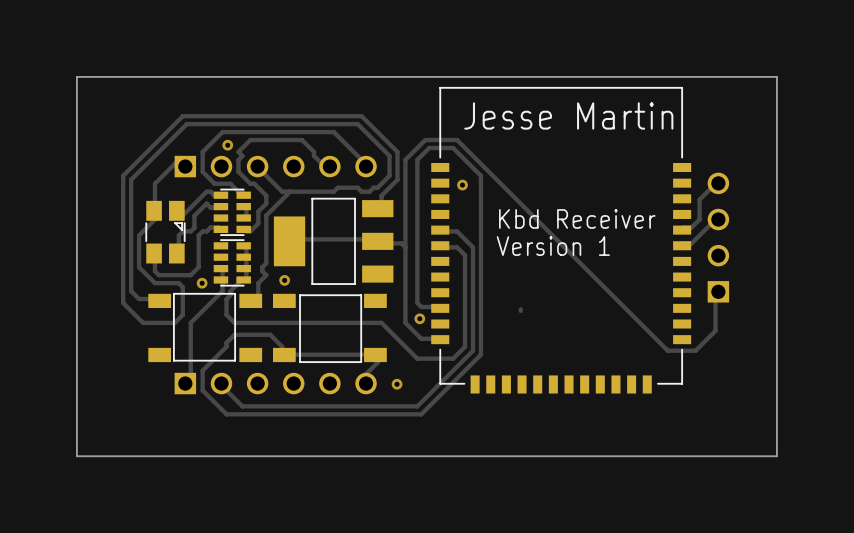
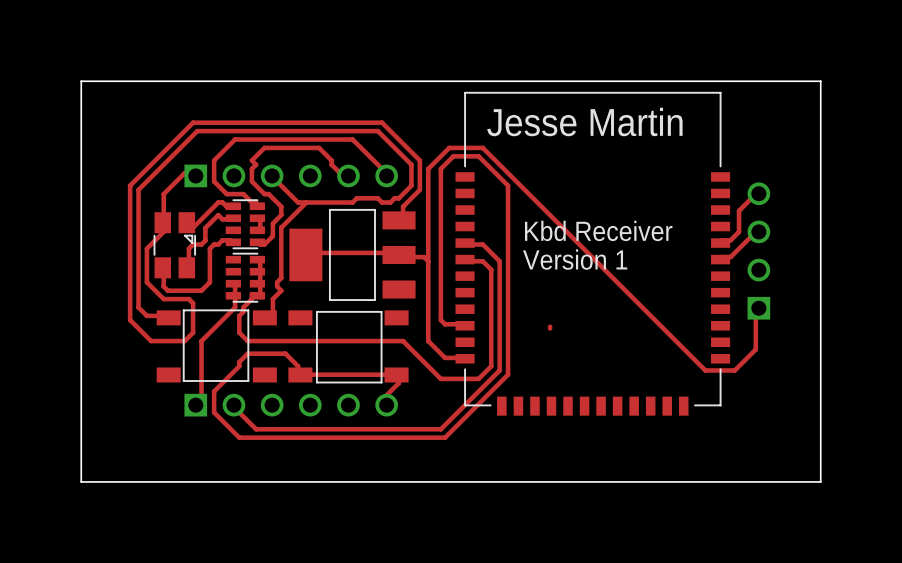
via: (227, 145) -> none
via: (462, 185) -> none
via: (284, 280) -> none
via: (202, 283) -> none
via: (419, 318) -> none
via: (397, 384) -> none

